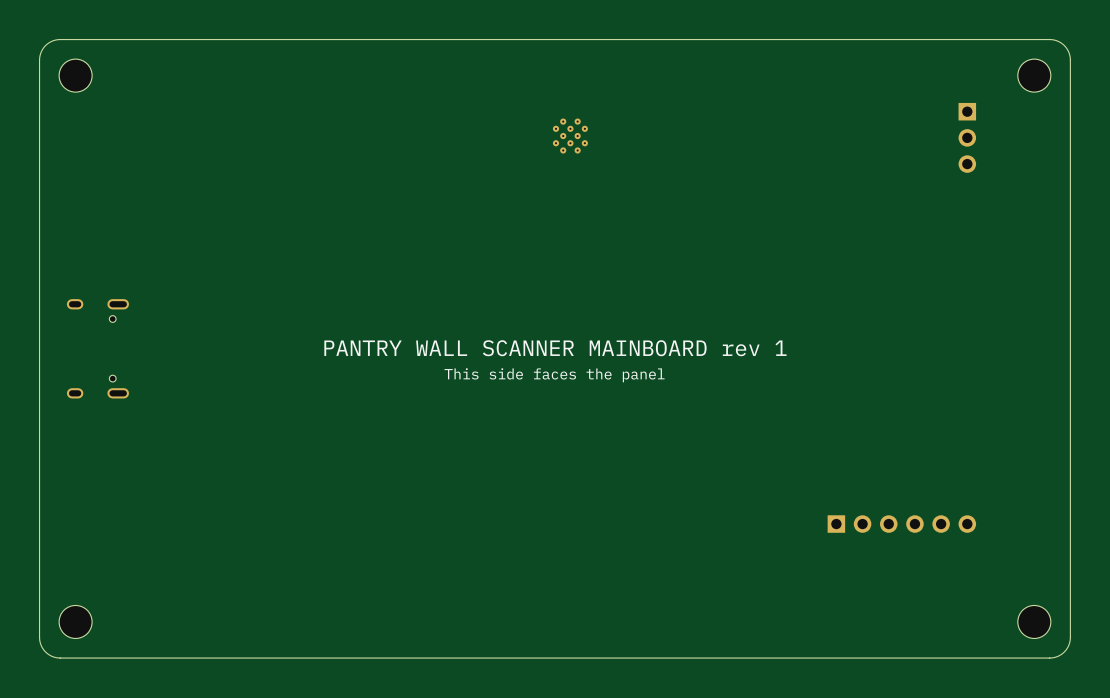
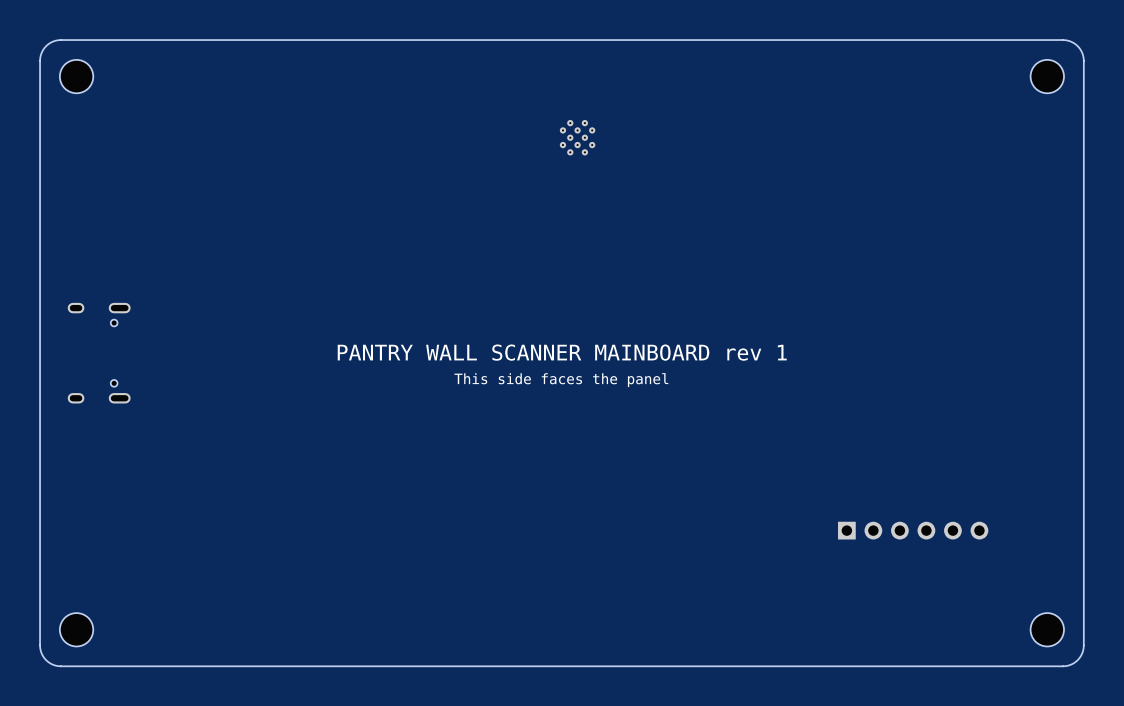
part: (967, 137) -> none

